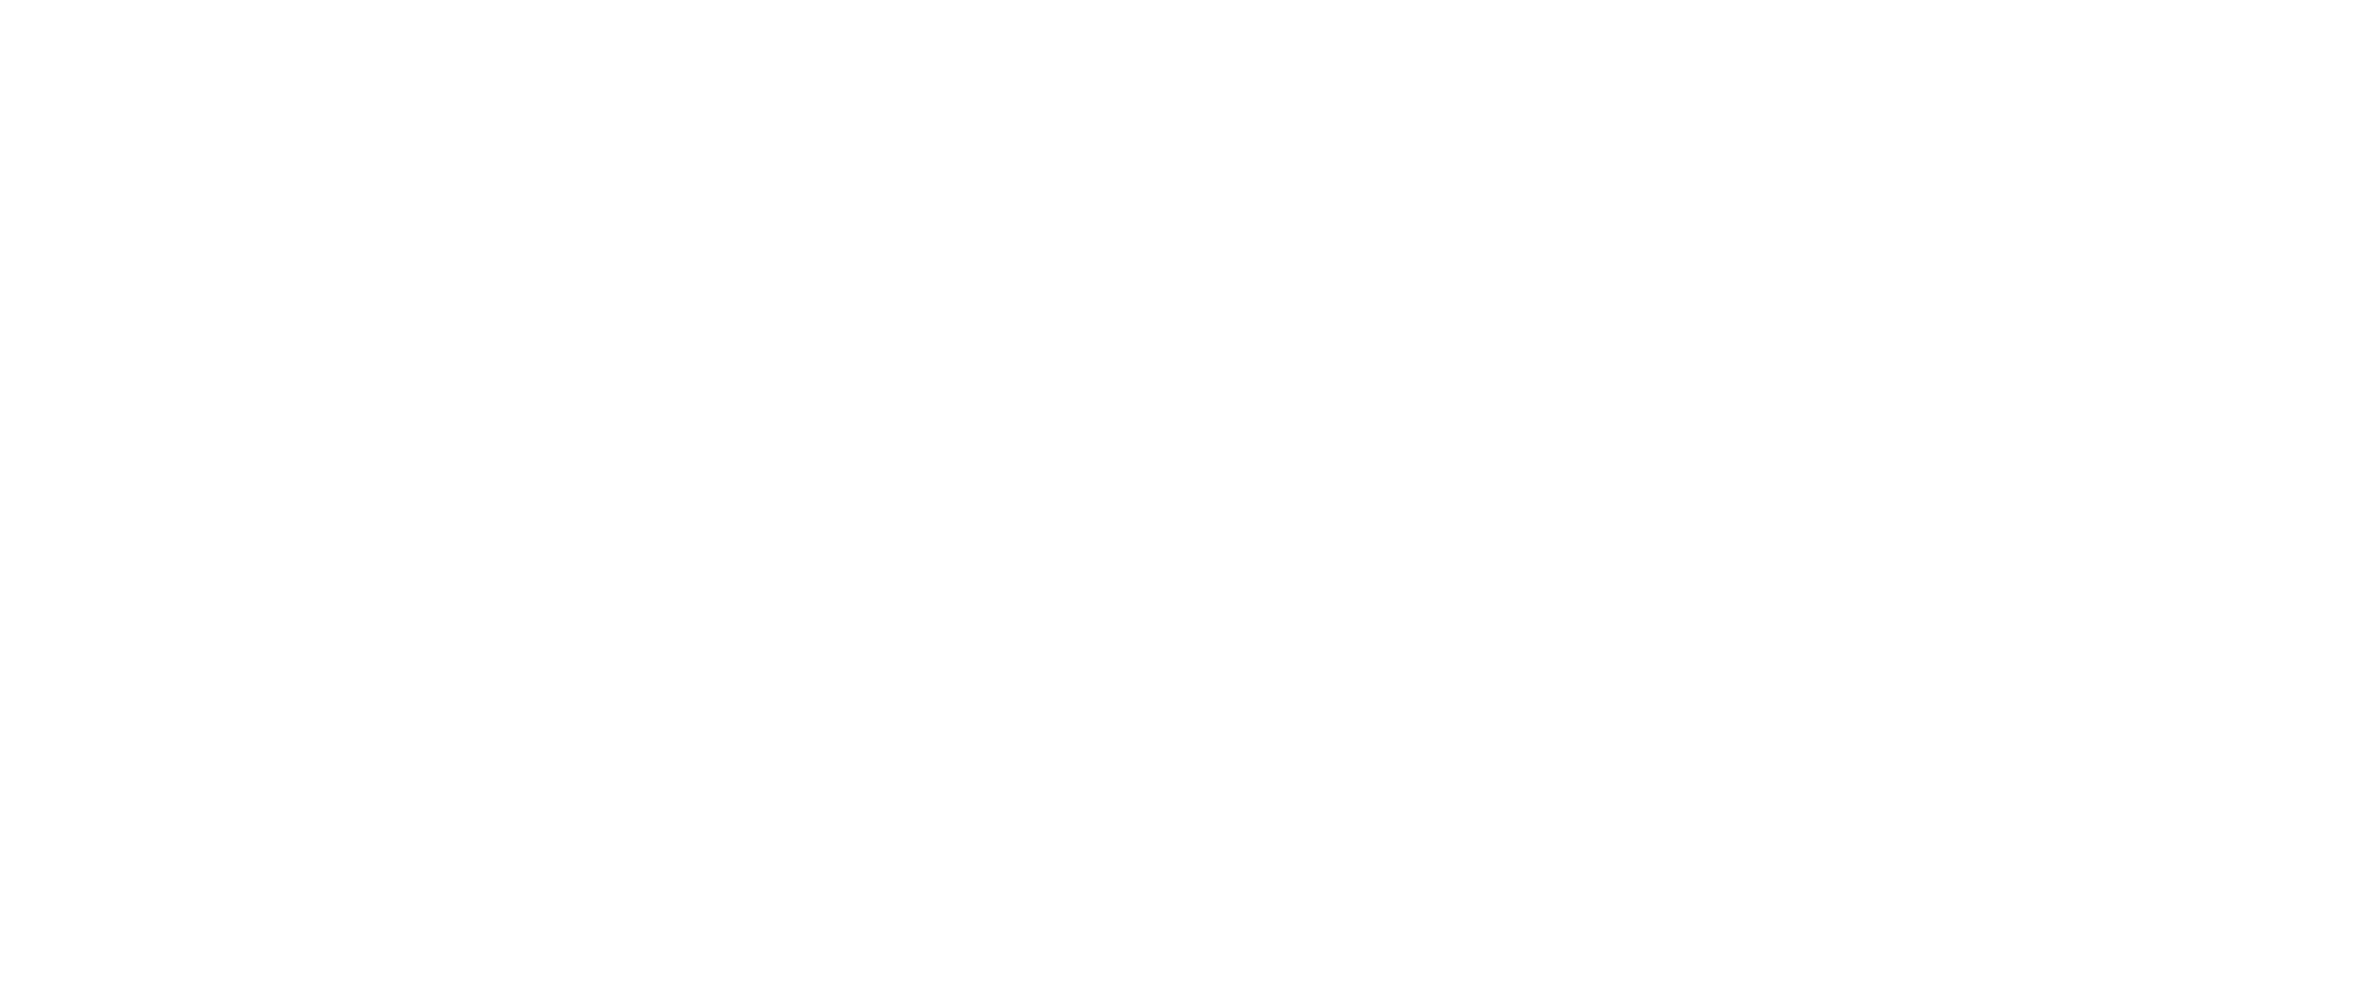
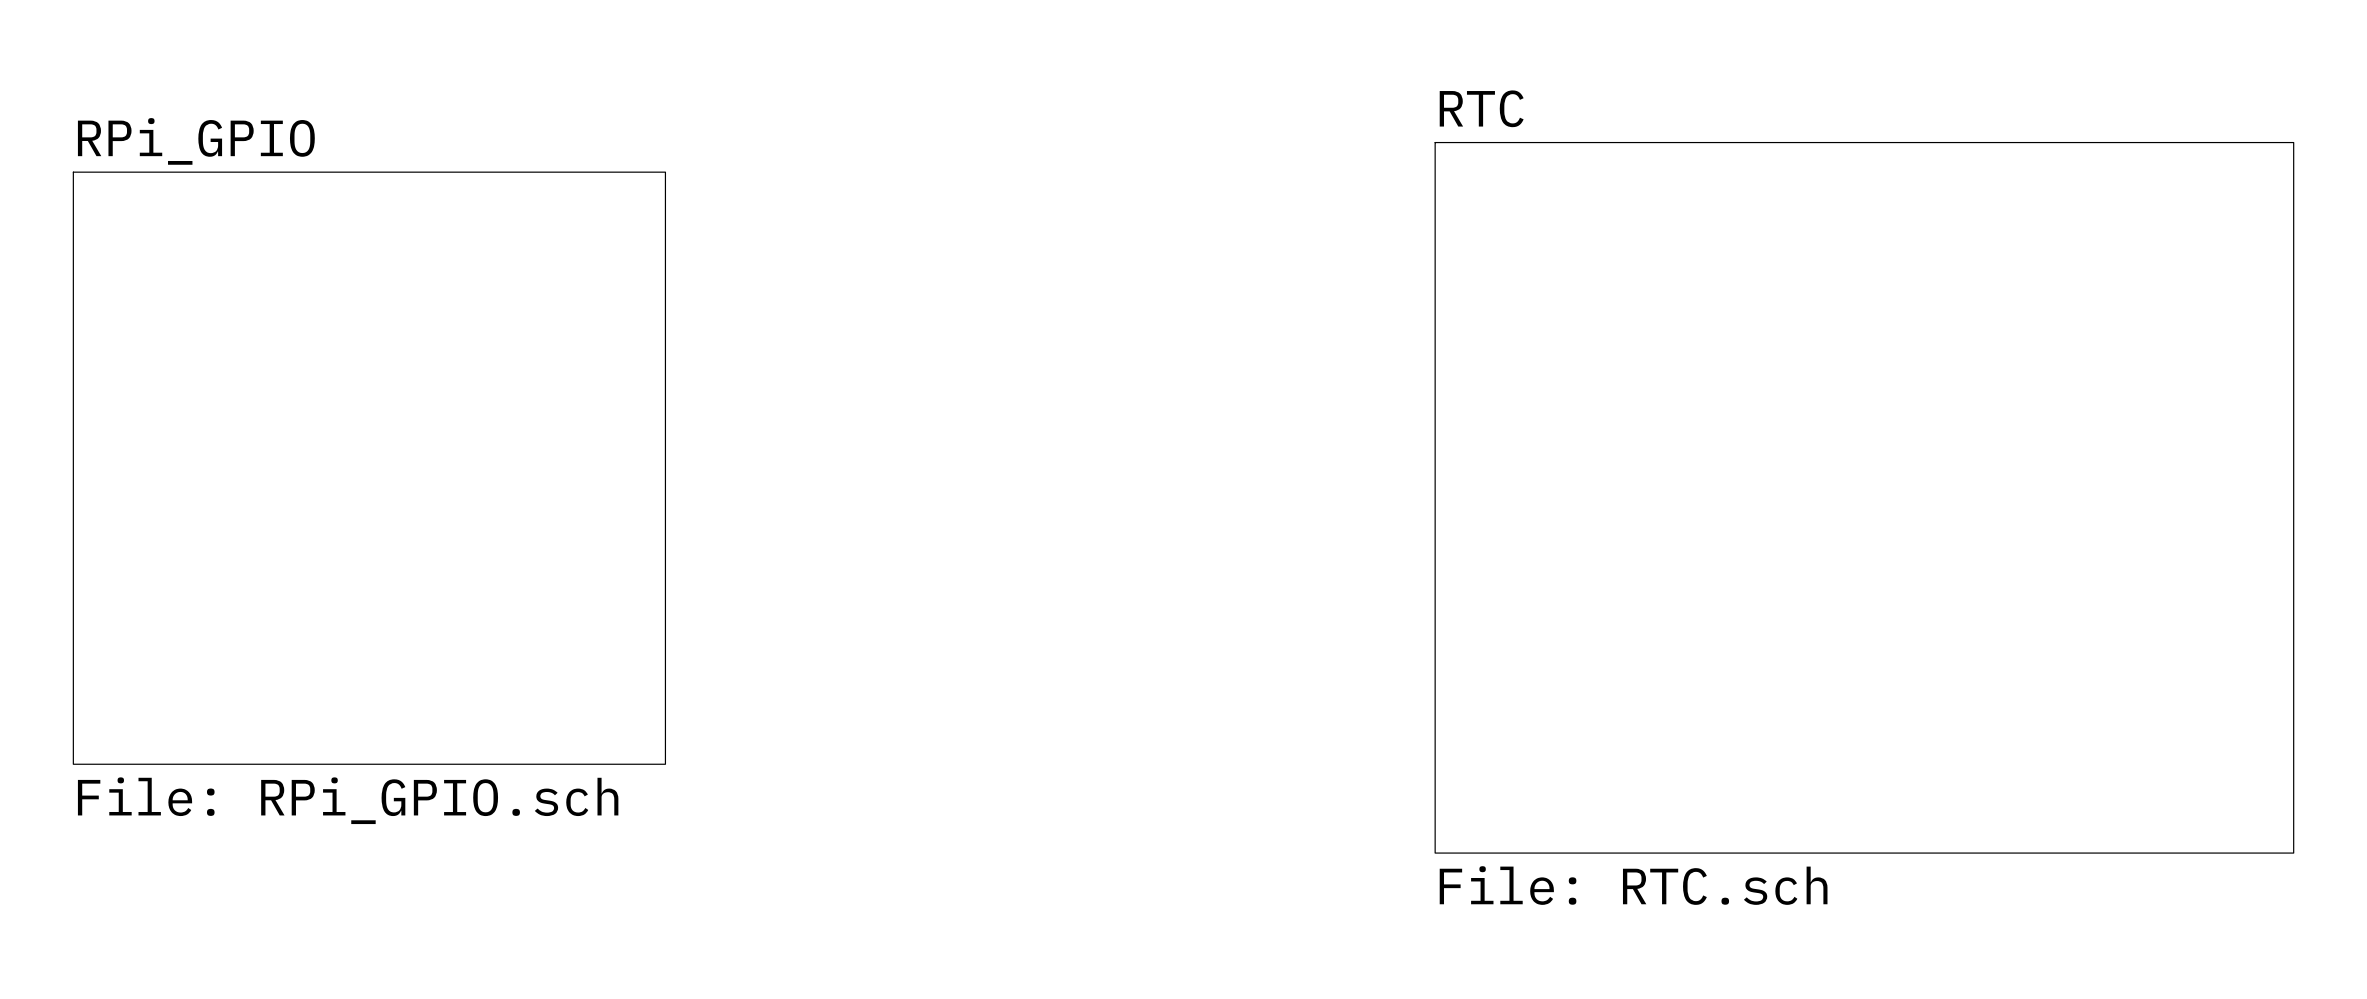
sheet RPi_GPIO: none -> File: RPi_GPIO.sch (369, 468)
sheet RTC: none -> File: RTC.sch (1864, 497)

